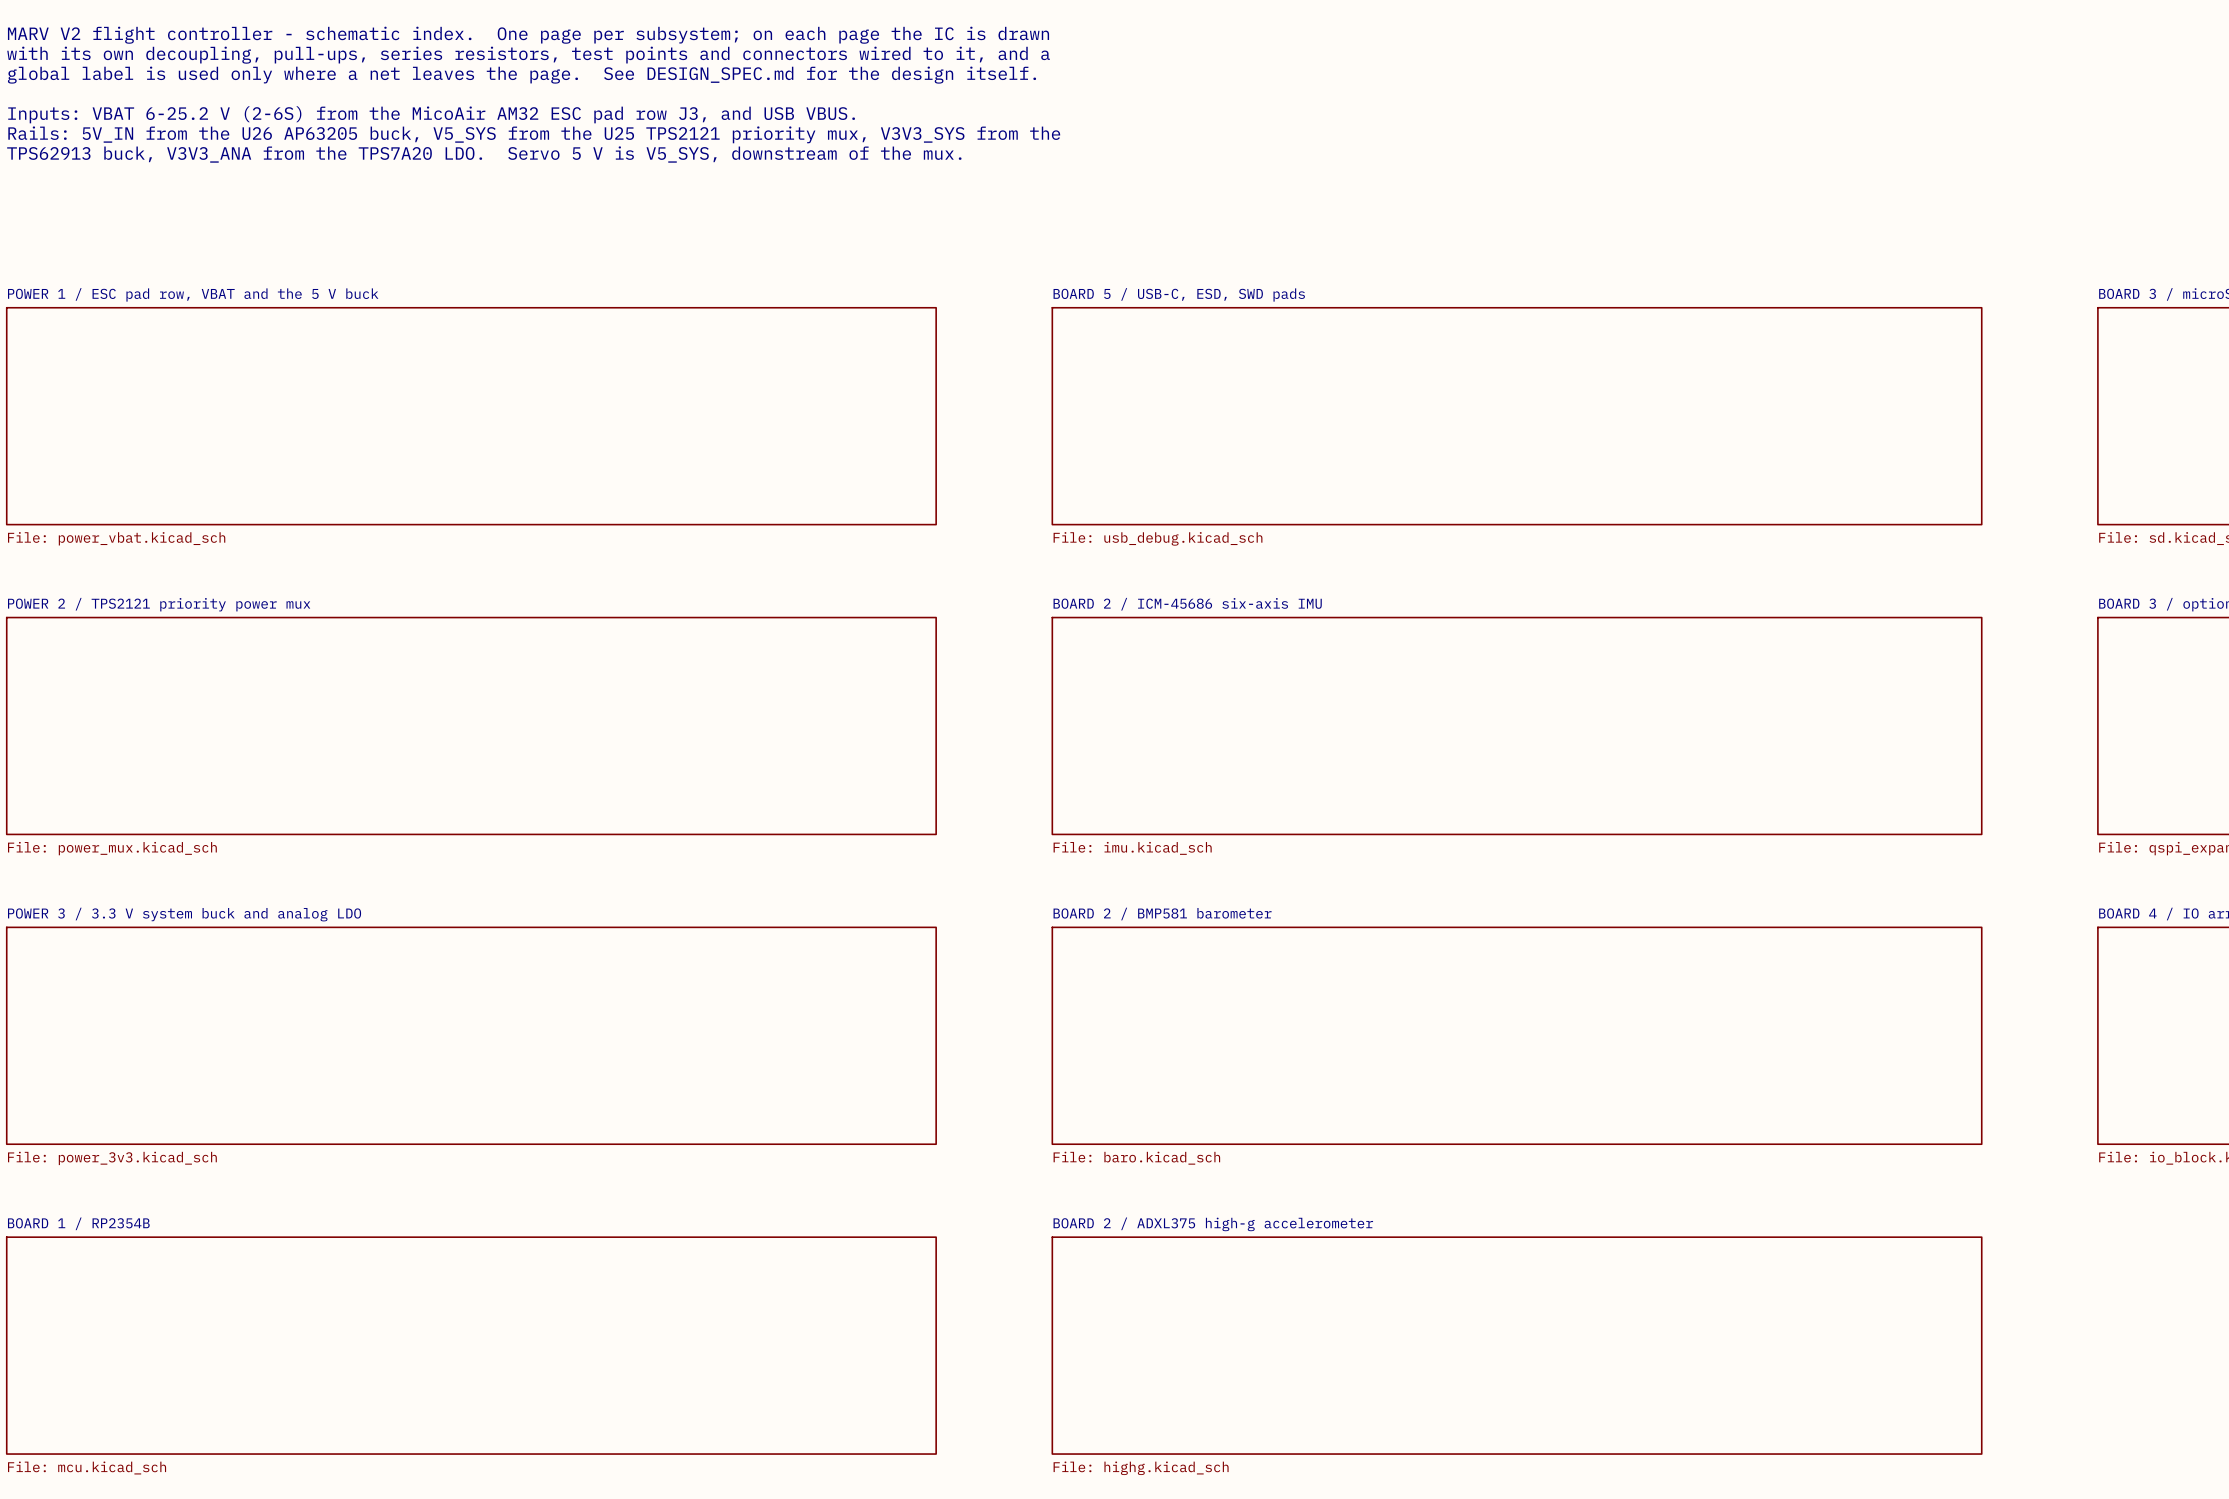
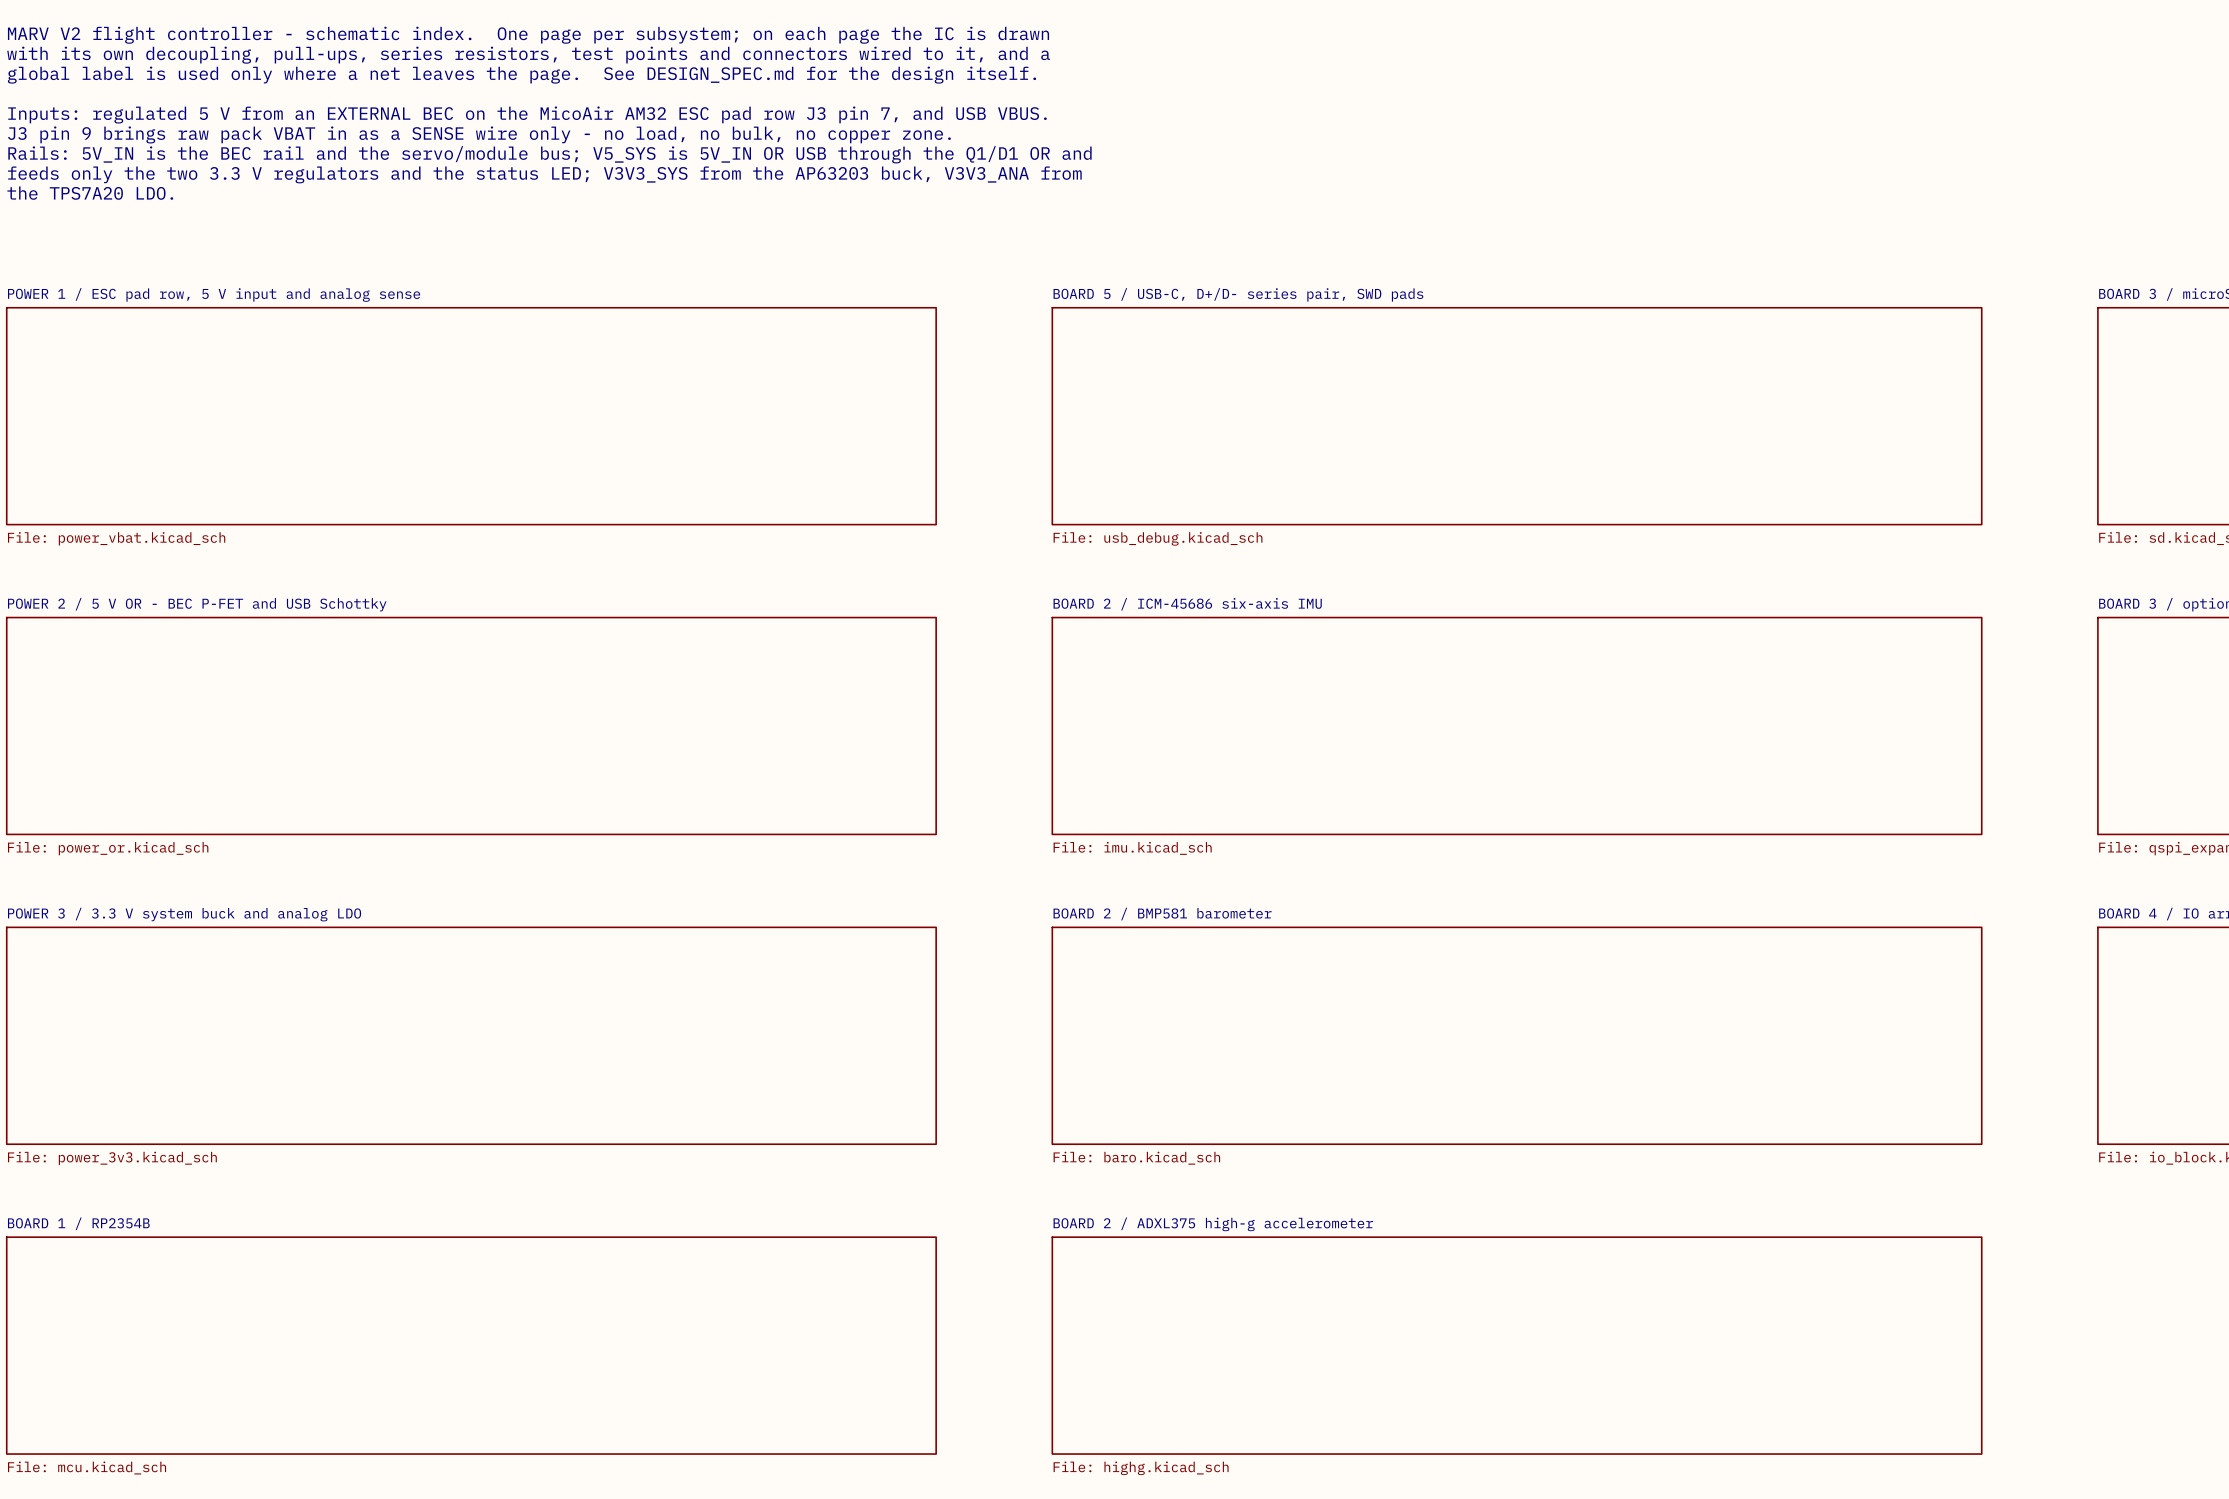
text: Inputs: VBAT 6-25.2 V (2-6S) from the MicoAir AM32 ESC pad row J3, and USB VBUS. (431, 114) -> Inputs: regulated 5 V from an EXTERNAL BEC on the MicoAir AM32 ESC pad row J3 pin 7, and USB VBUS. (527, 115)
text: Rails: 5V_IN from the U26 AP63205 buck, V5_SYS from the U25 TPS2121 priority mux, V3V3_SYS from the (534, 134) -> J3 pin 9 brings raw pack VBAT in as a SENSE wire only - no load, no bulk, no copper zone. (479, 134)
text: TPS62913 buck, V3V3_ANA from the TPS7A20 LDO. Servo 5 V is V5_SYS, downstream of the mux. (484, 154) -> Rails: 5V_IN is the BEC rail and the servo/module bus; V5_SYS is 5V_IN OR USB through the Q1/D1 OR and (549, 154)
text: none -> feeds only the two 3.3 V regulators and the status LED; V3V3_SYS from the AP63203 buck, V3V3_ANA from (544, 174)
text: none -> the TPS7A20 LDO. (90, 193)
sheet POWER 1 / ESC pad row, VBAT and the 5 V buck name: POWER 1 / ESC pad row, VBAT and the 5 V buck (193, 294) -> POWER 1 / ESC pad row, 5 V input and analog sense (214, 294)
sheet BOARD 5 / USB-C, ESD, SWD pads name: BOARD 5 / USB-C, ESD, SWD pads (1179, 294) -> BOARD 5 / USB-C, D+/D- series pair, SWD pads (1238, 294)
sheet POWER 2 / TPS2121 priority power mux name: POWER 2 / TPS2121 priority power mux (159, 604) -> POWER 2 / 5 V OR - BEC P-FET and USB Schottky (197, 604)
sheet POWER 2 / TPS2121 priority power mux value: File: power_mux.kicad_sch (112, 848) -> File: power_or.kicad_sch (108, 848)

